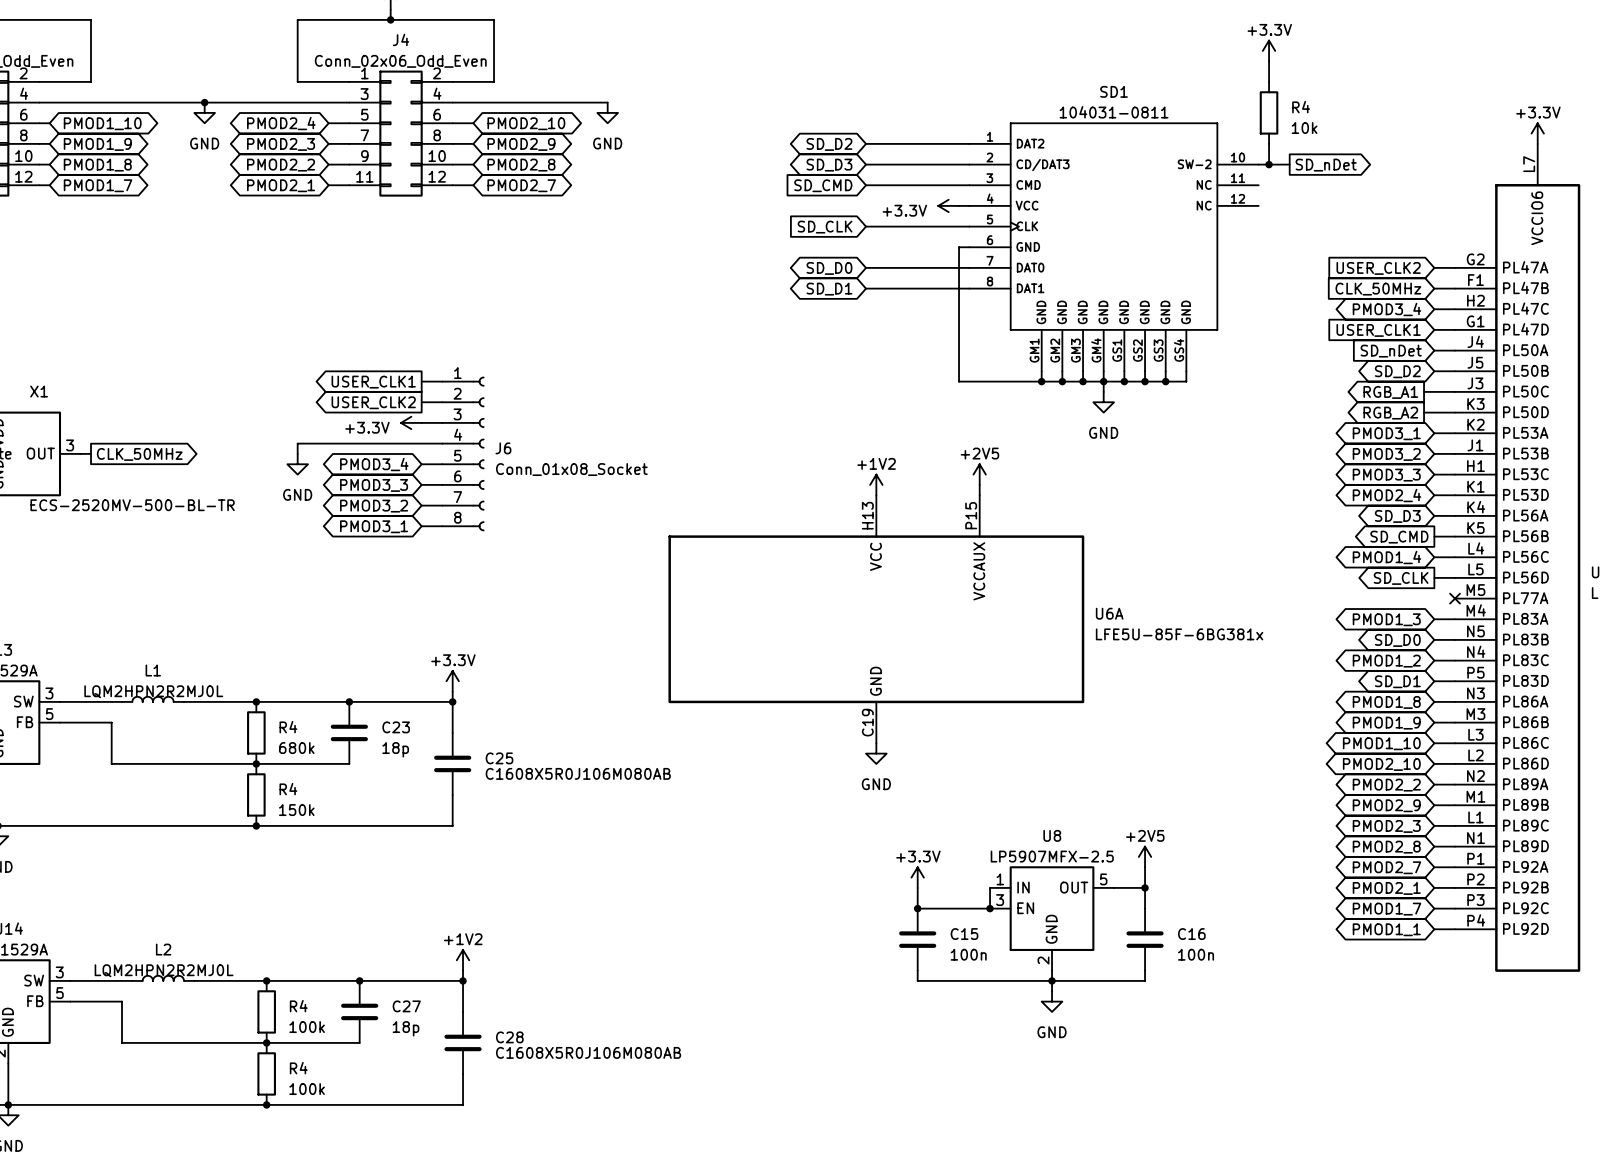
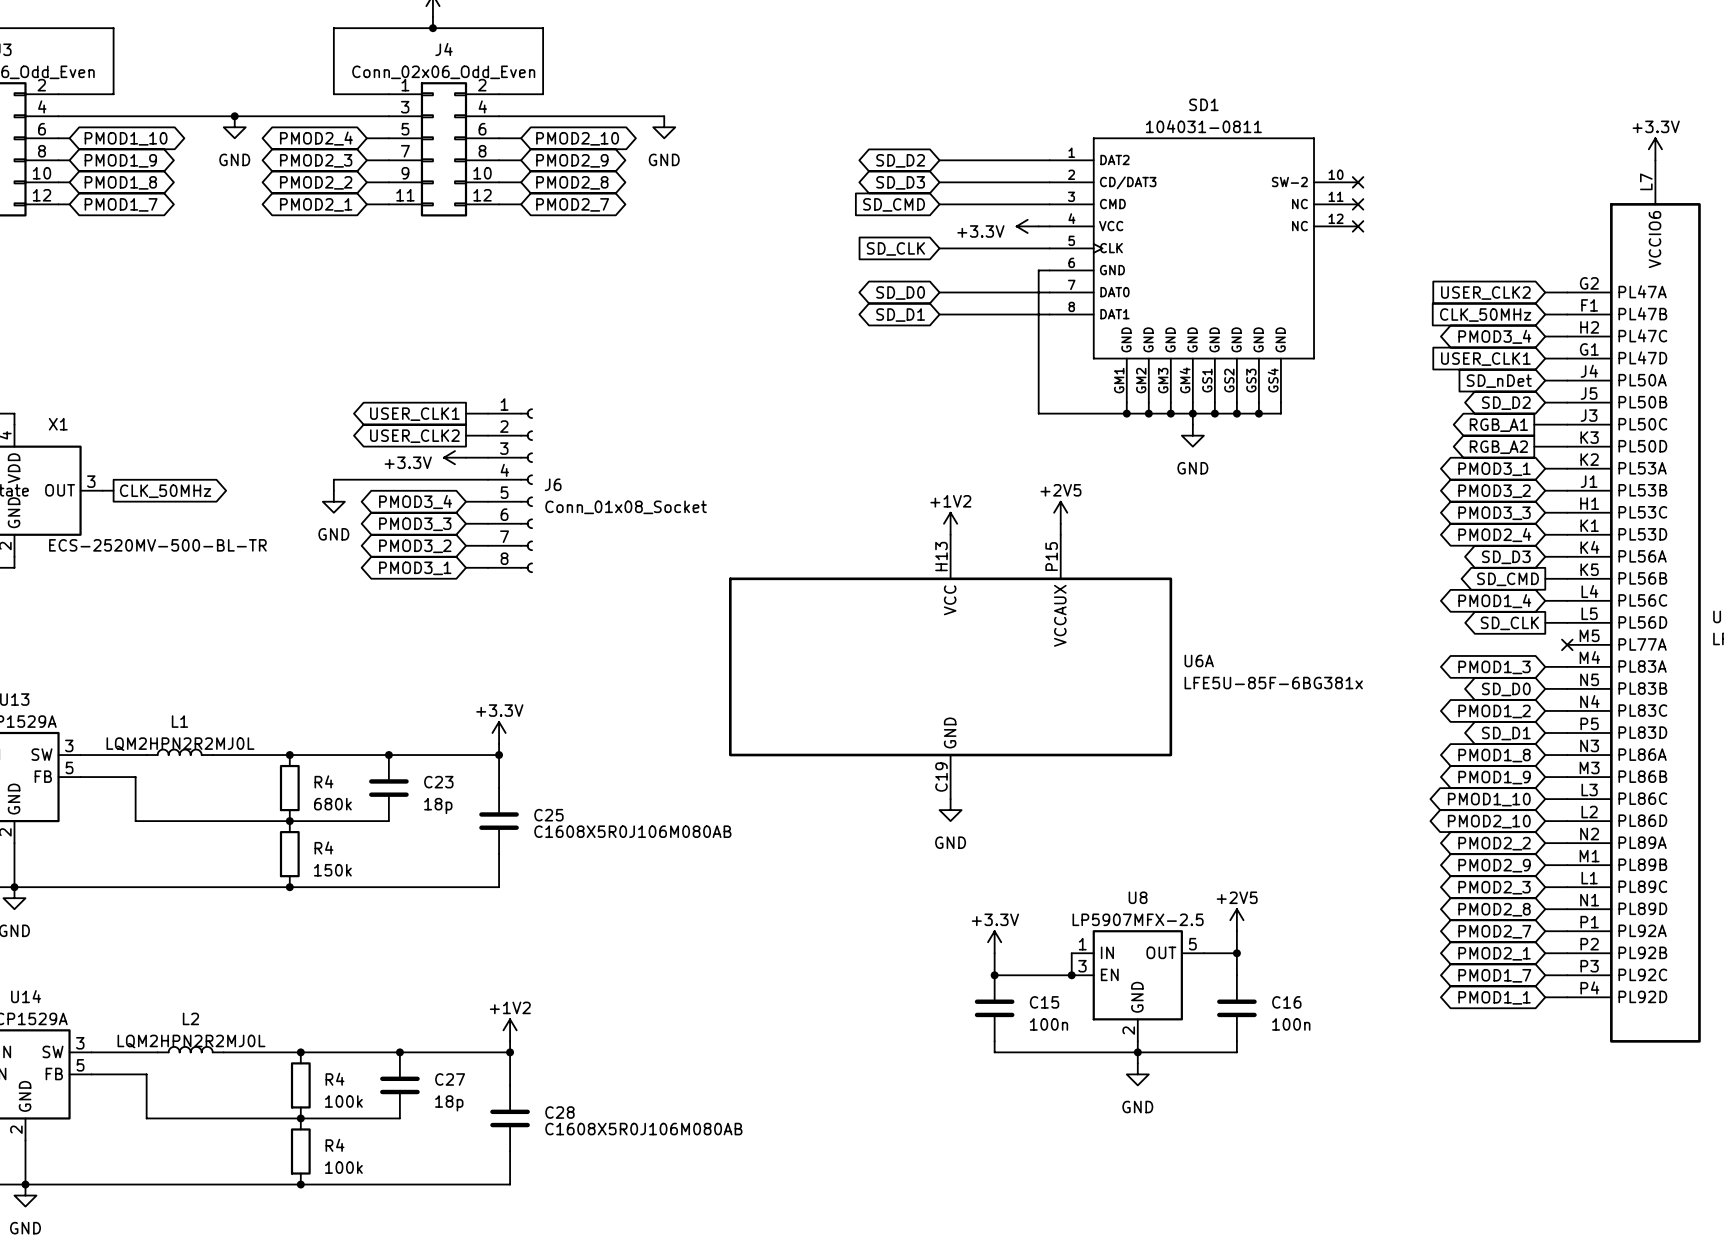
power symbol: +3.3V (1269, 50) -> none
wire: (1269, 61) (1269, 81) -> none
R4: 10k (1269, 112) -> none
wire: (1269, 143) (1269, 164) -> none
wire: (1258, 164) (1289, 164) -> none
no-connect mark: none -> (1358, 182)
junction: (1269, 164) -> none
global label: SD_nDet (1326, 165) -> none
no-connect mark: none -> (1358, 204)
no-connect mark: none -> (1358, 226)

